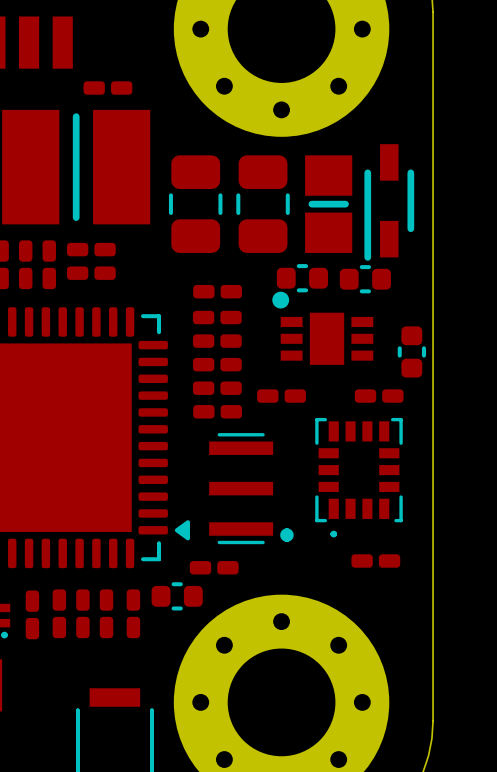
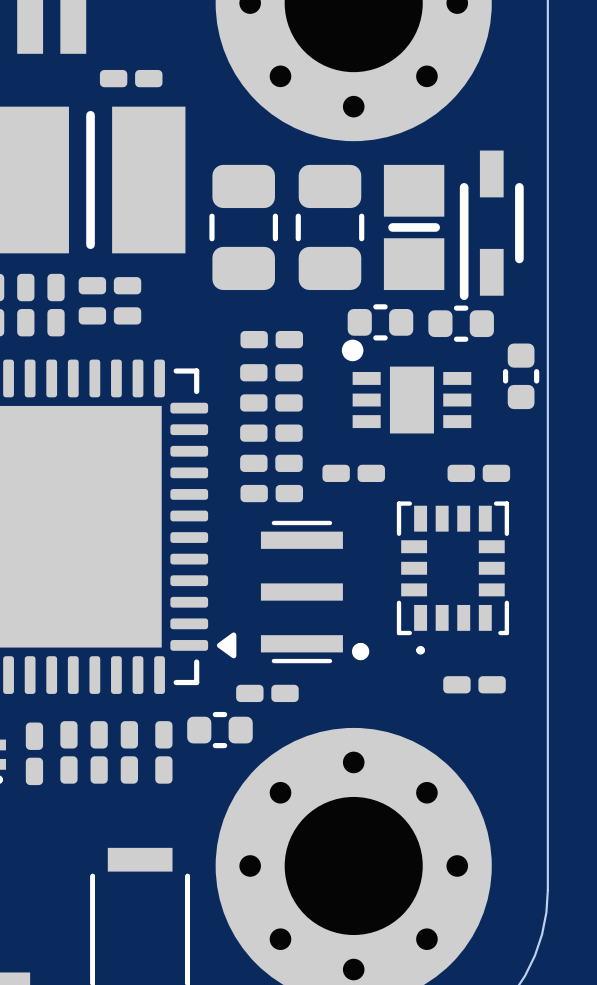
part position: (411, 351) -> (521, 376)

